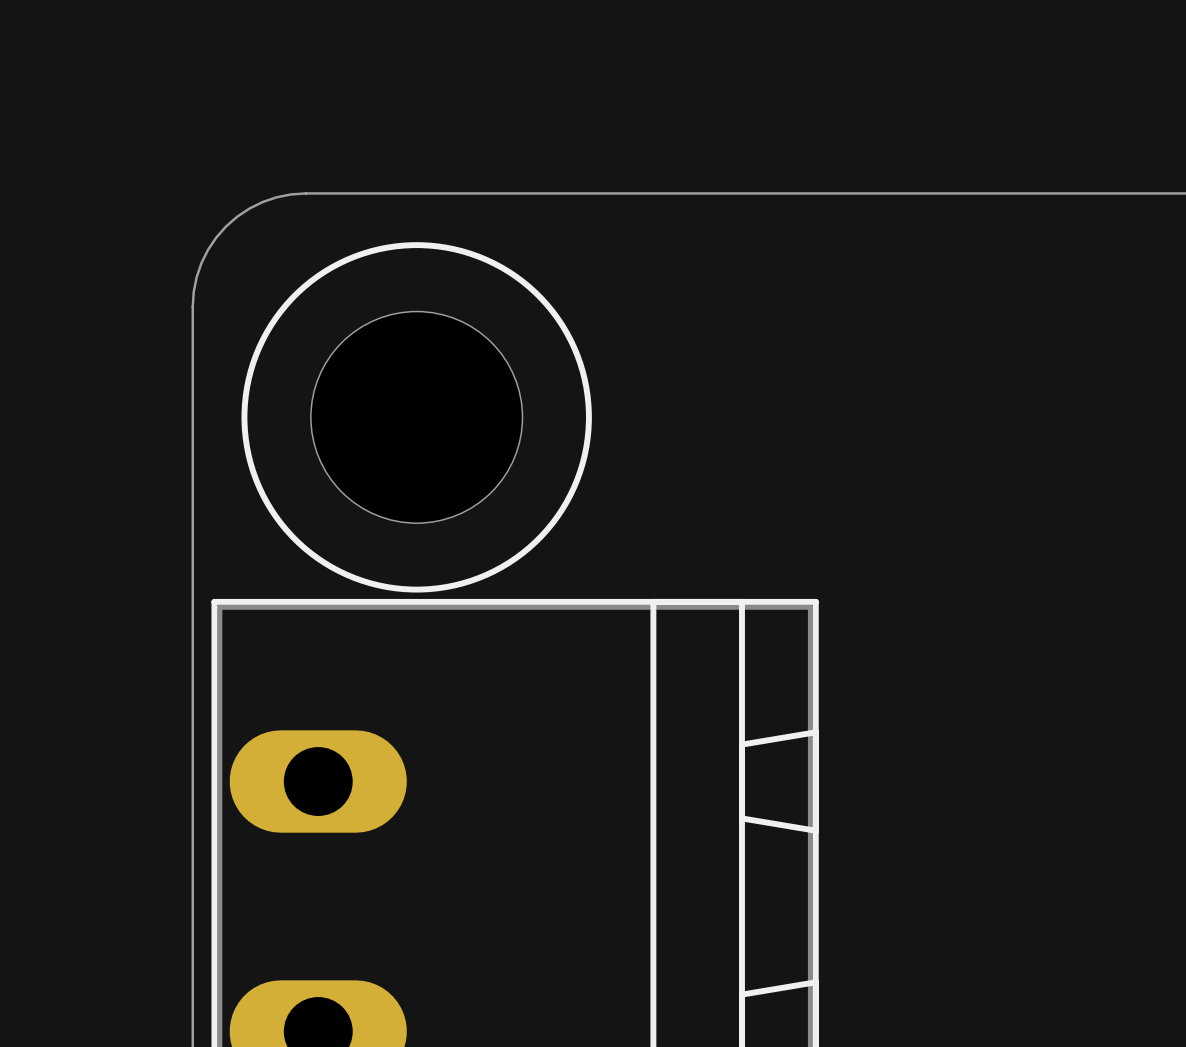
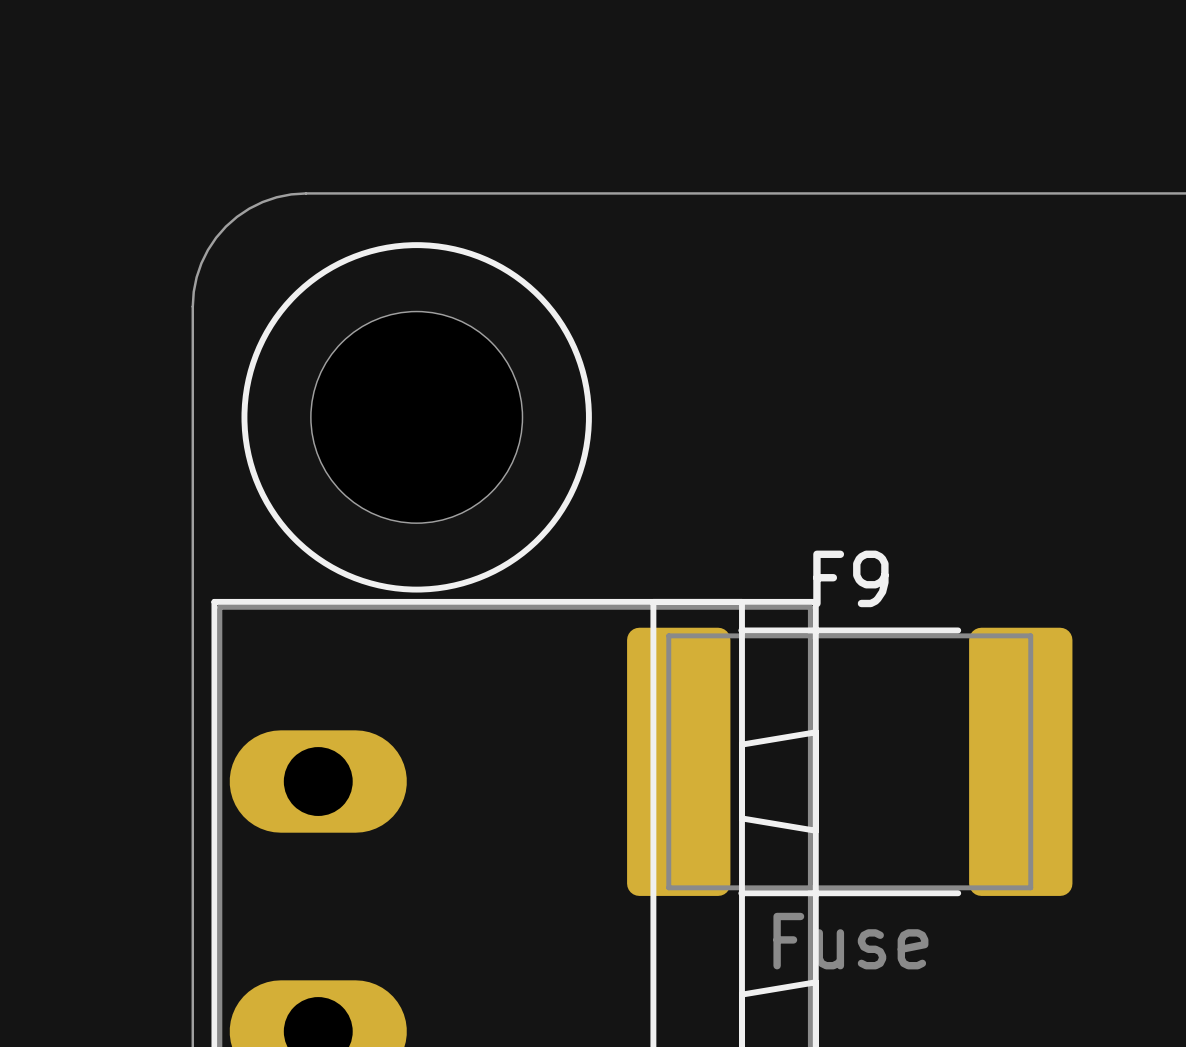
F9: none -> Fuse (849, 761)

